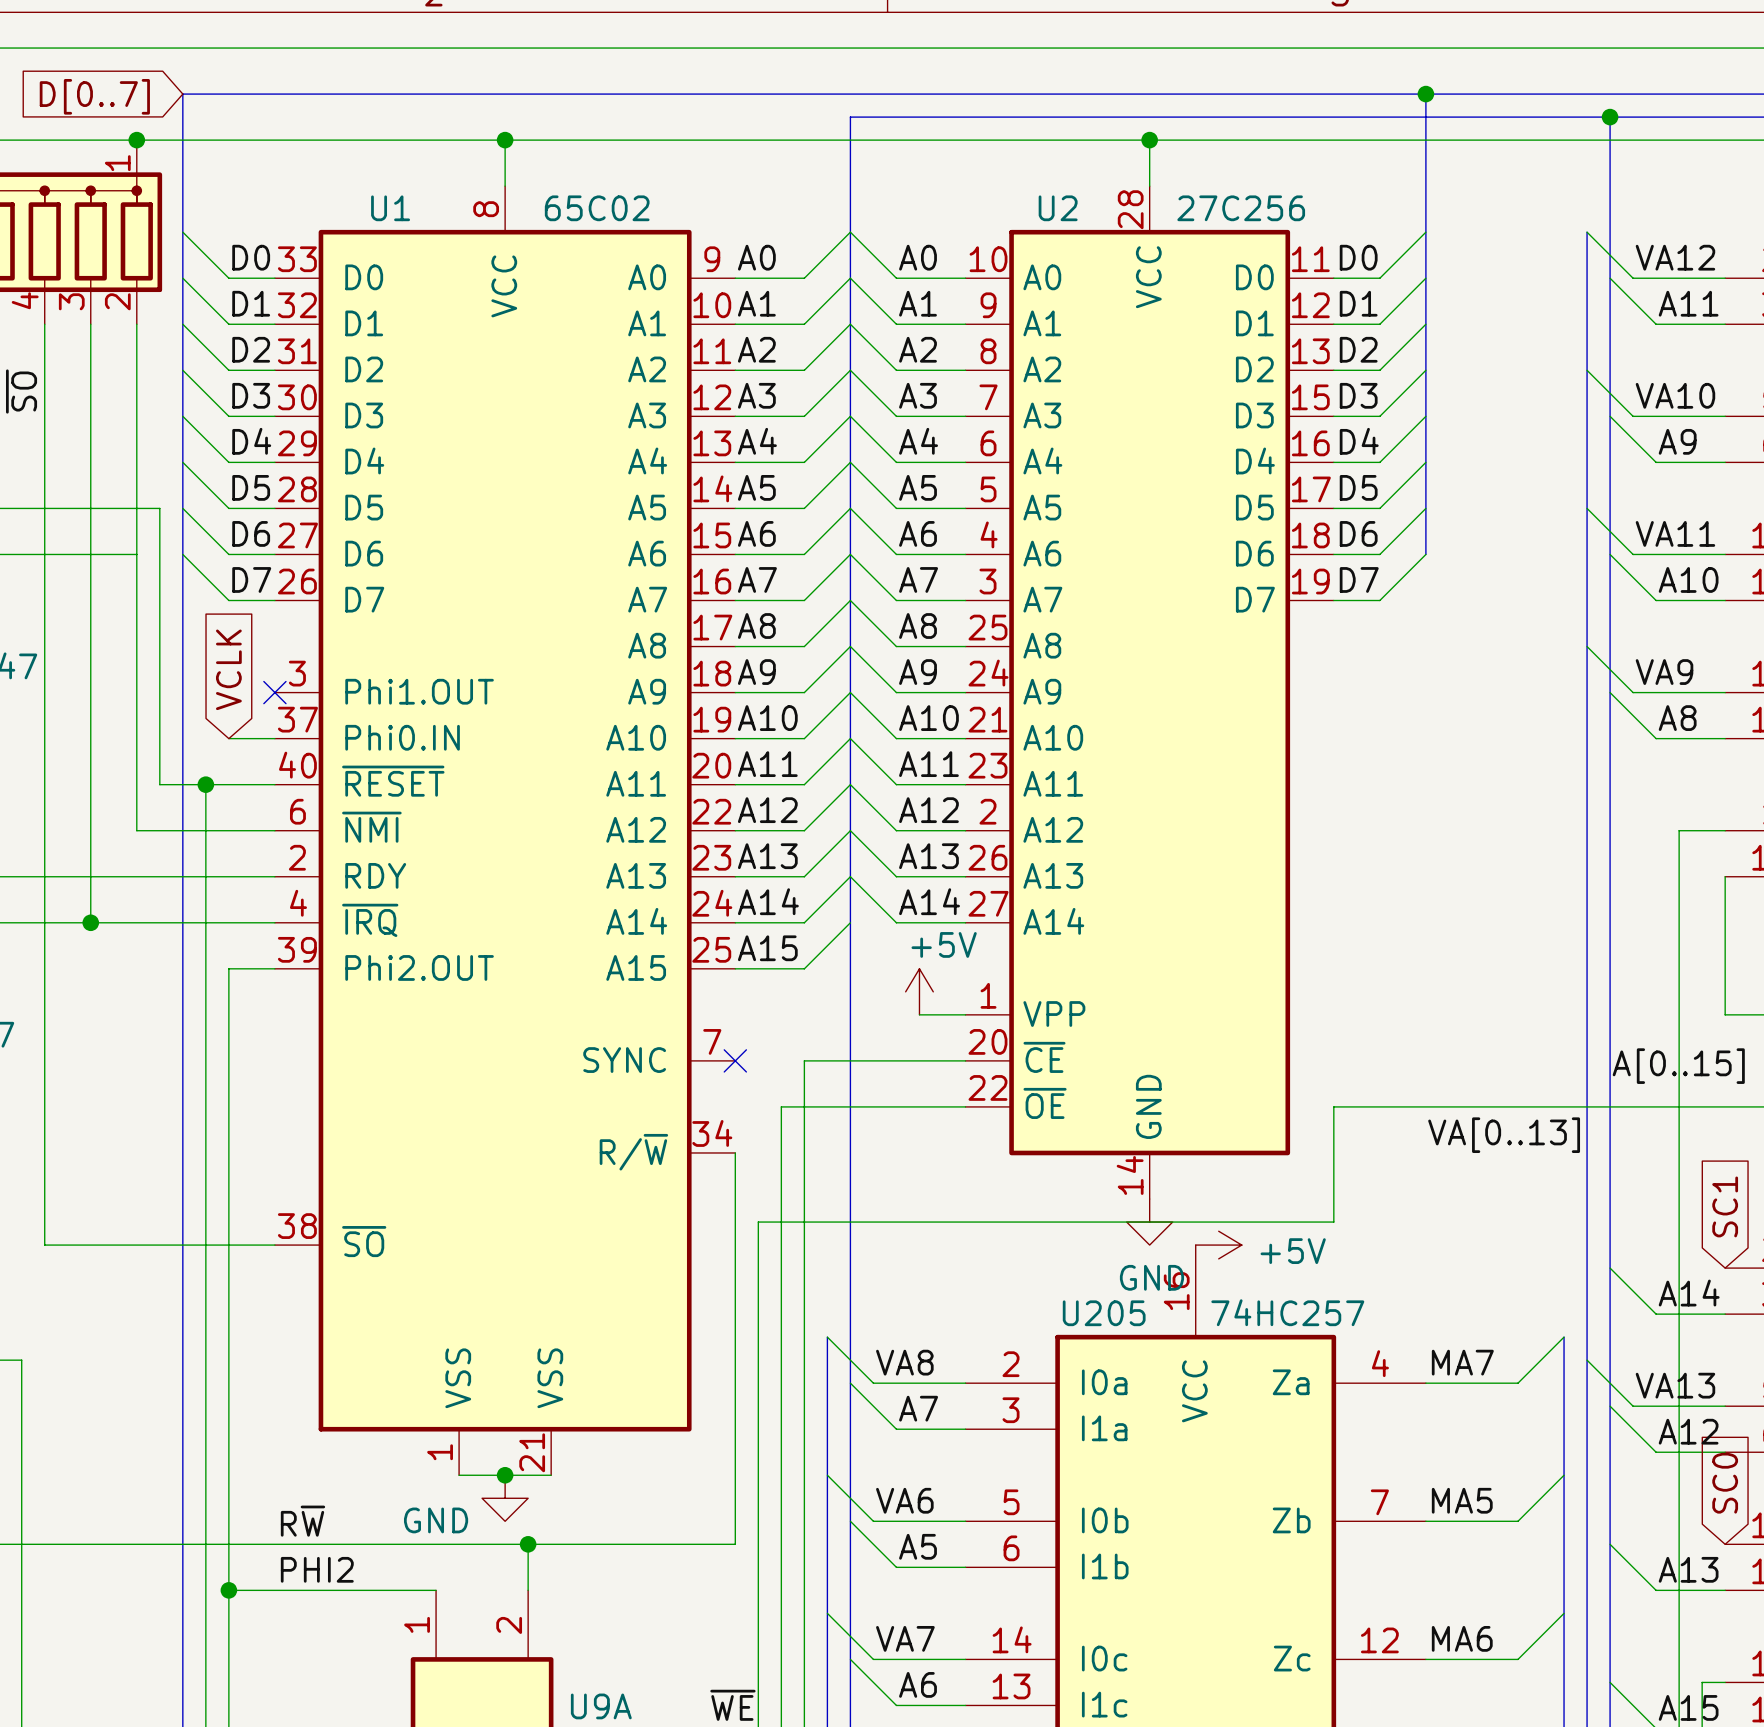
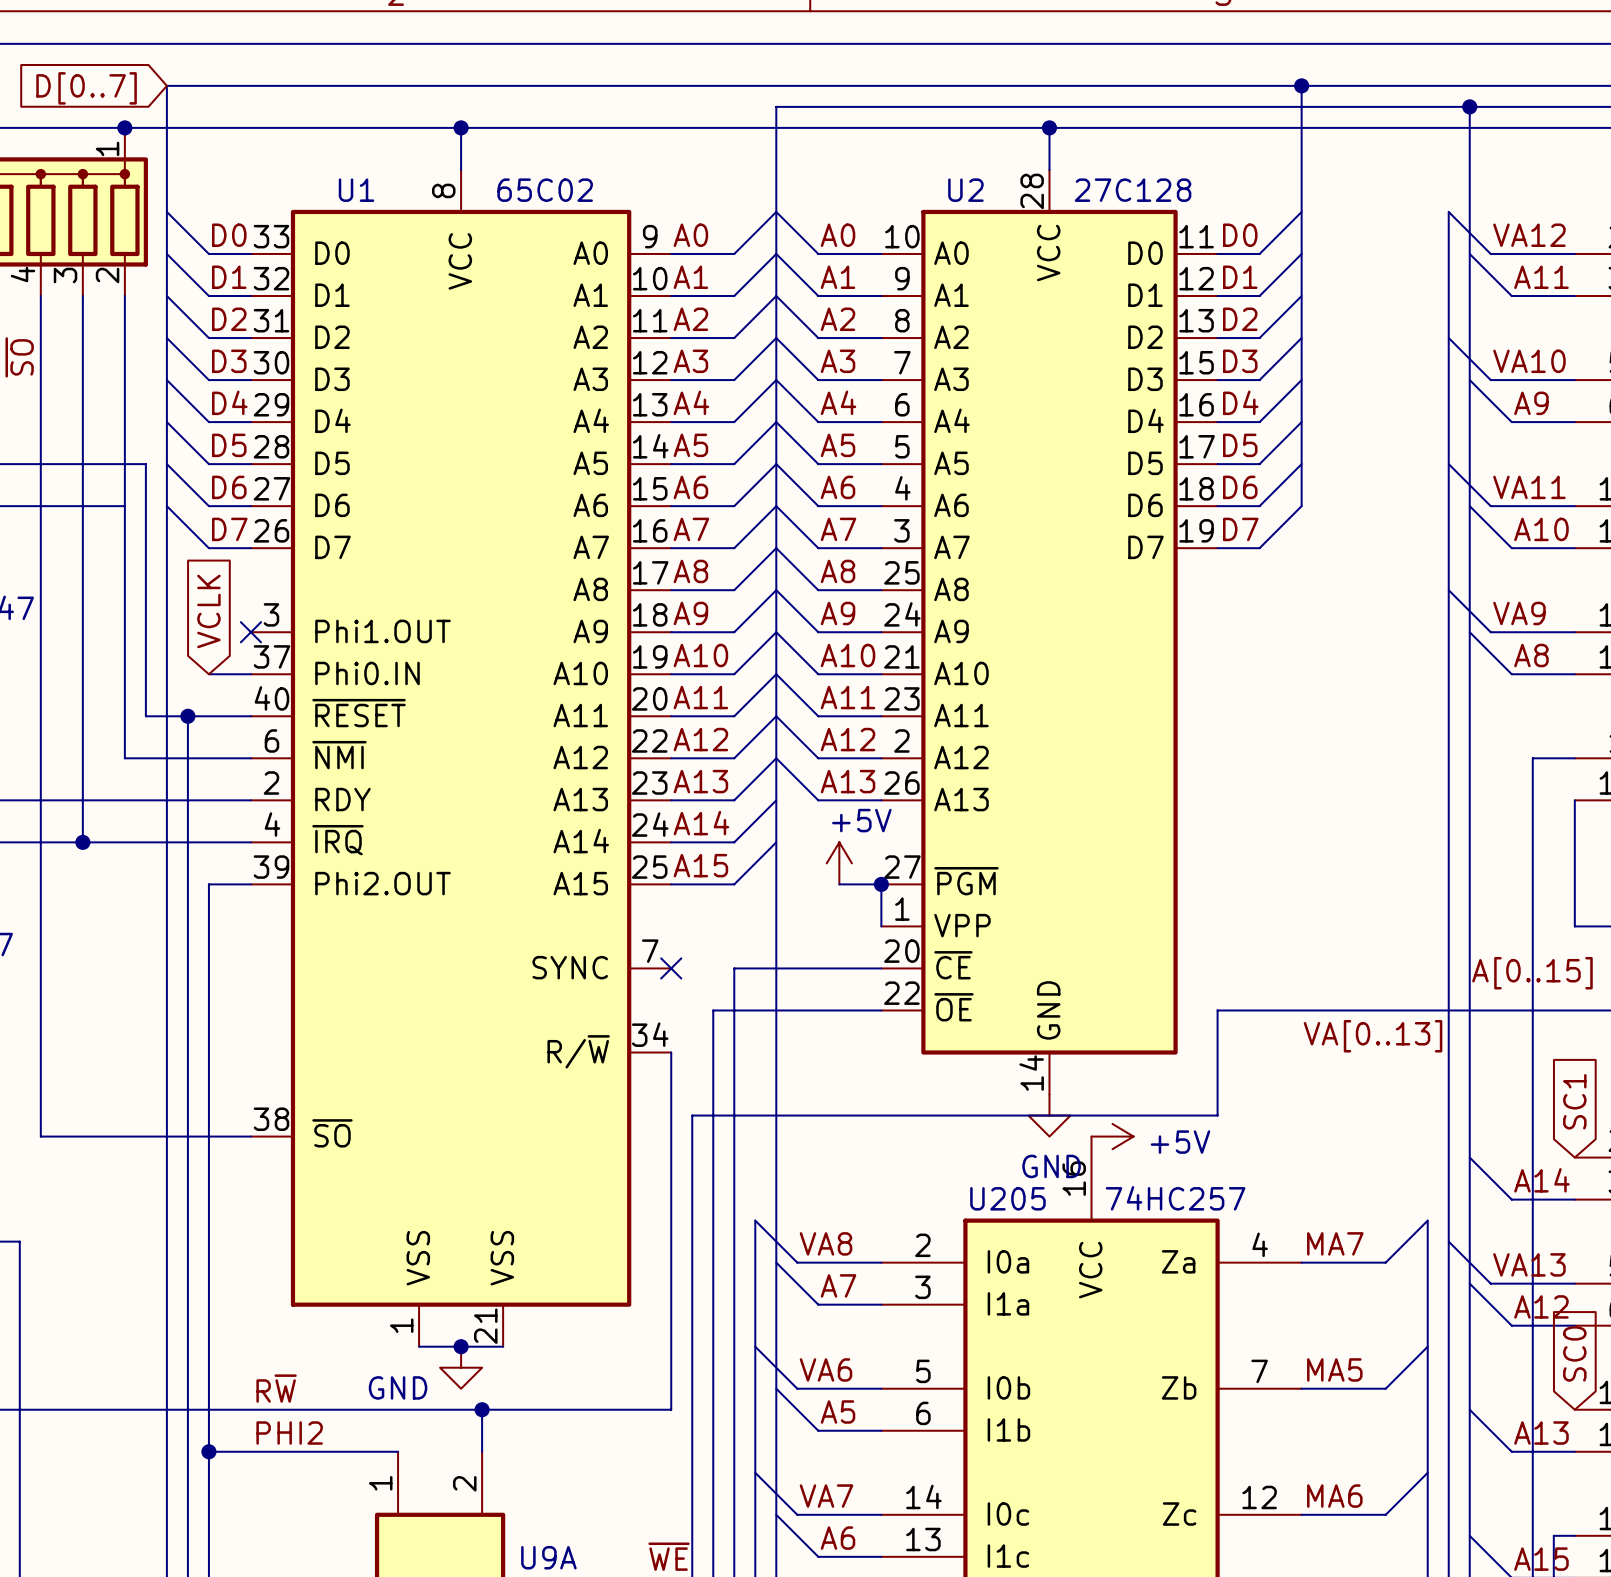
U2 symbol: [965, 186, 1334, 1200] -> [881, 169, 1218, 1095]
U2 value: 27C256 (1241, 208) -> 27C128 (1133, 190)
wire: (850, 876) (896, 922) (965, 922) -> none
label: A14 (929, 901) -> none
junction: none -> (881, 884)
power symbol position: +5V (919, 991) -> +5V (839, 863)
wire: (919, 1014) (965, 1014) -> (839, 884) (881, 884) (881, 926)

